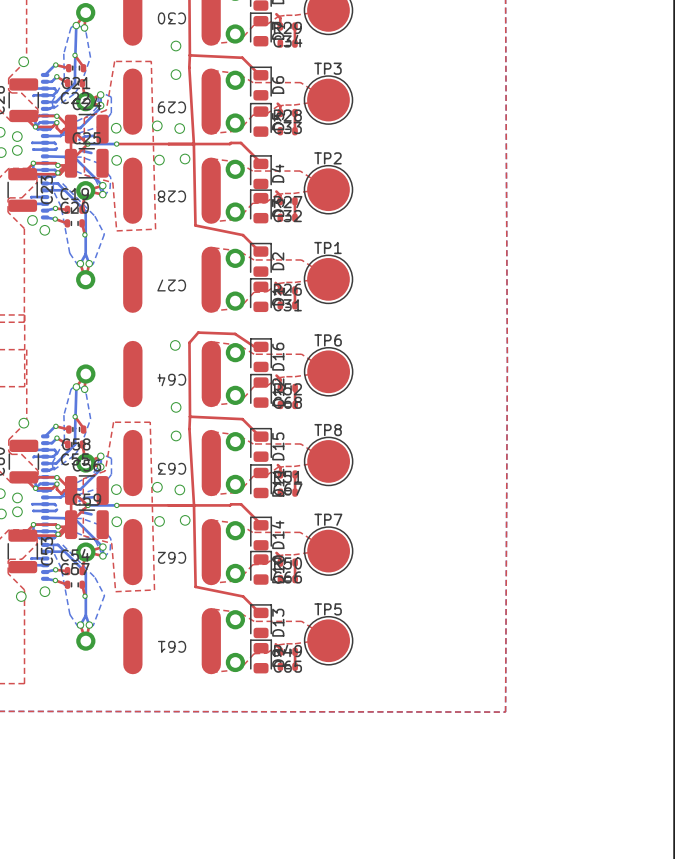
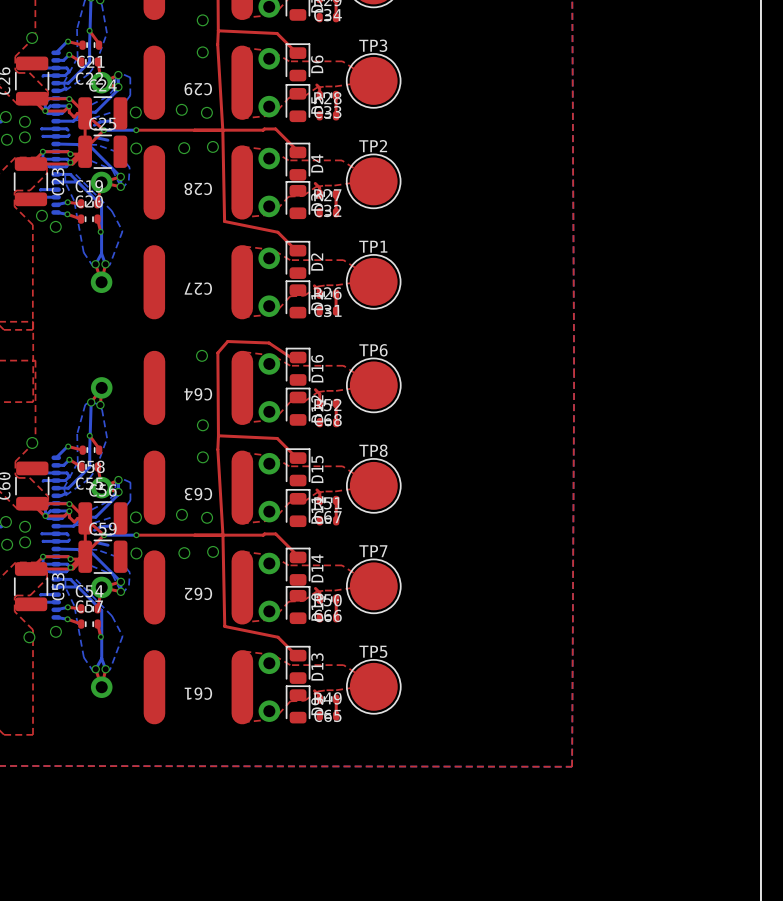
top zone outline: (114, 61) (151, 61) (155, 229) (116, 230) (112, 182) (84, 174) (84, 118) (106, 110) (114, 61) -> none
top zone outline: (113, 422) (150, 422) (154, 589) (115, 591) (111, 543) (83, 535) (83, 478) (105, 471) (113, 422) -> none

